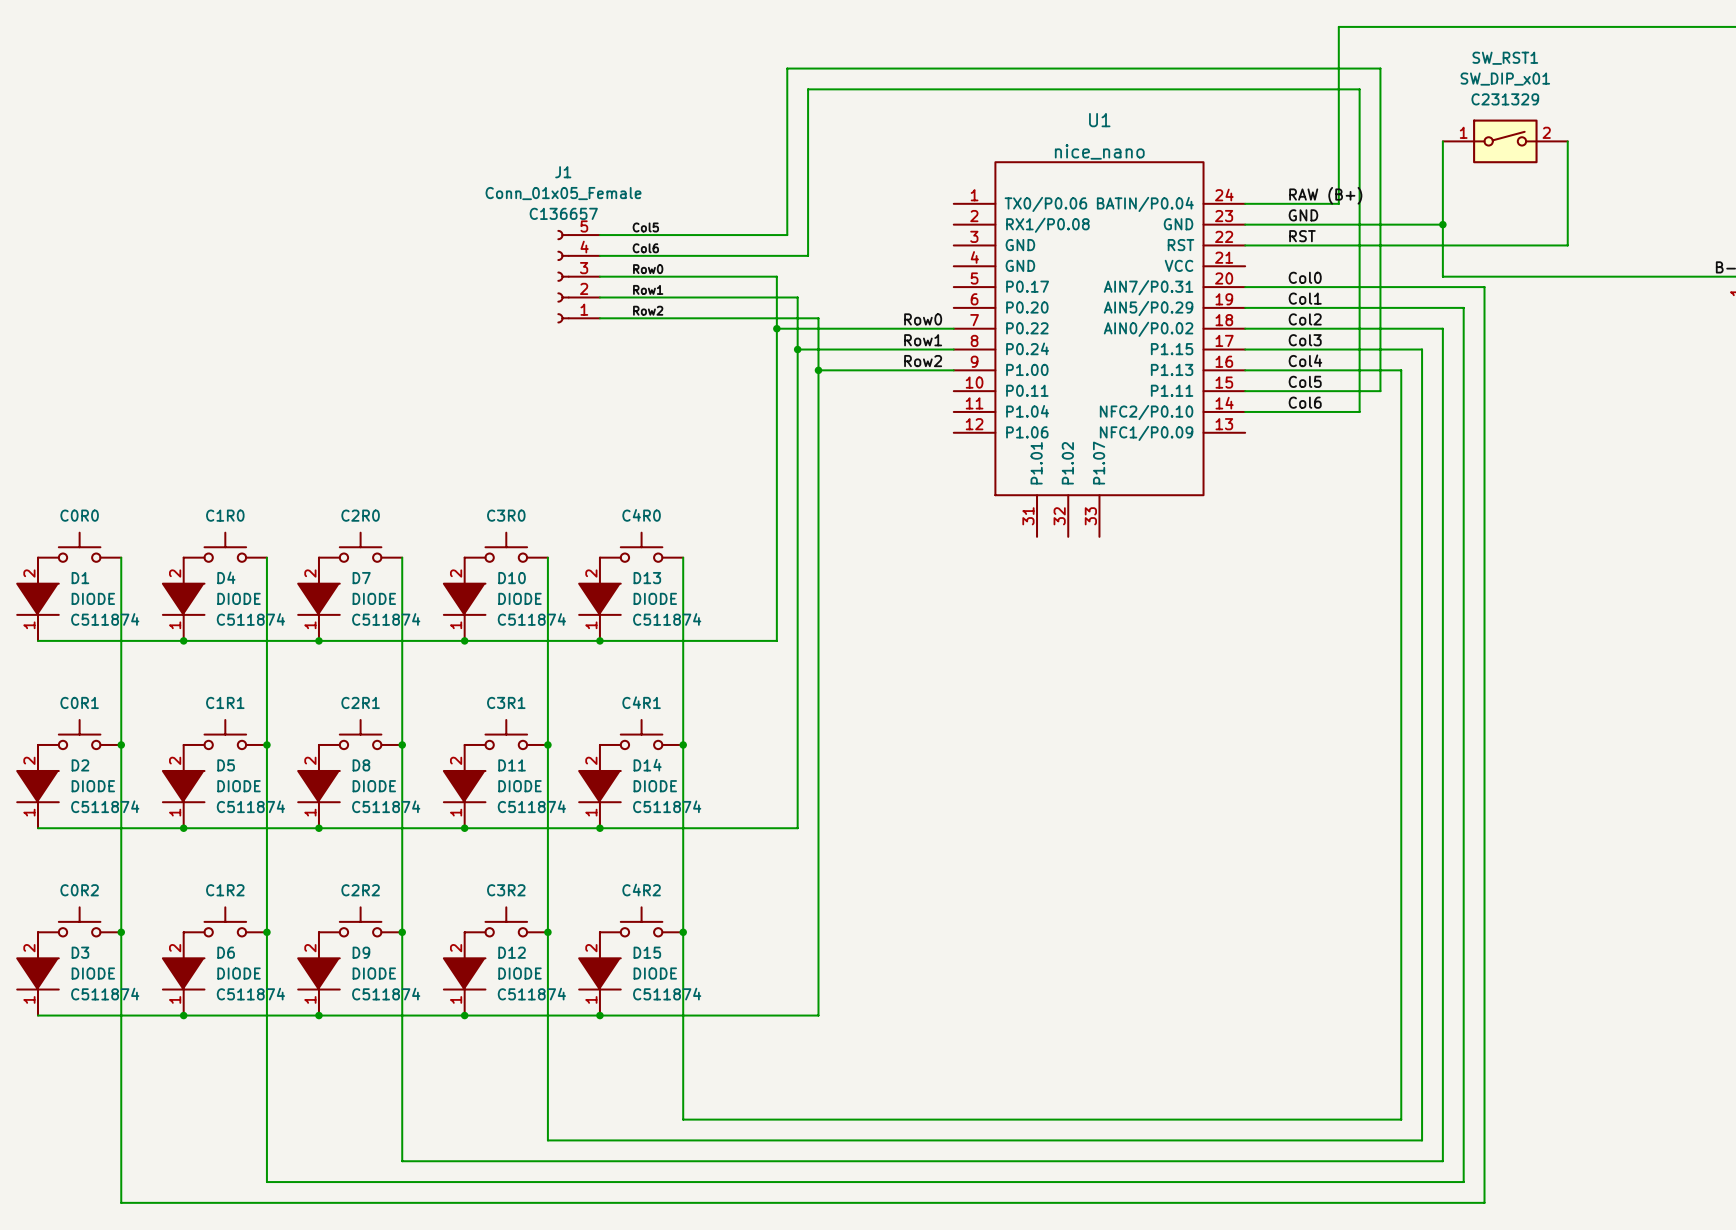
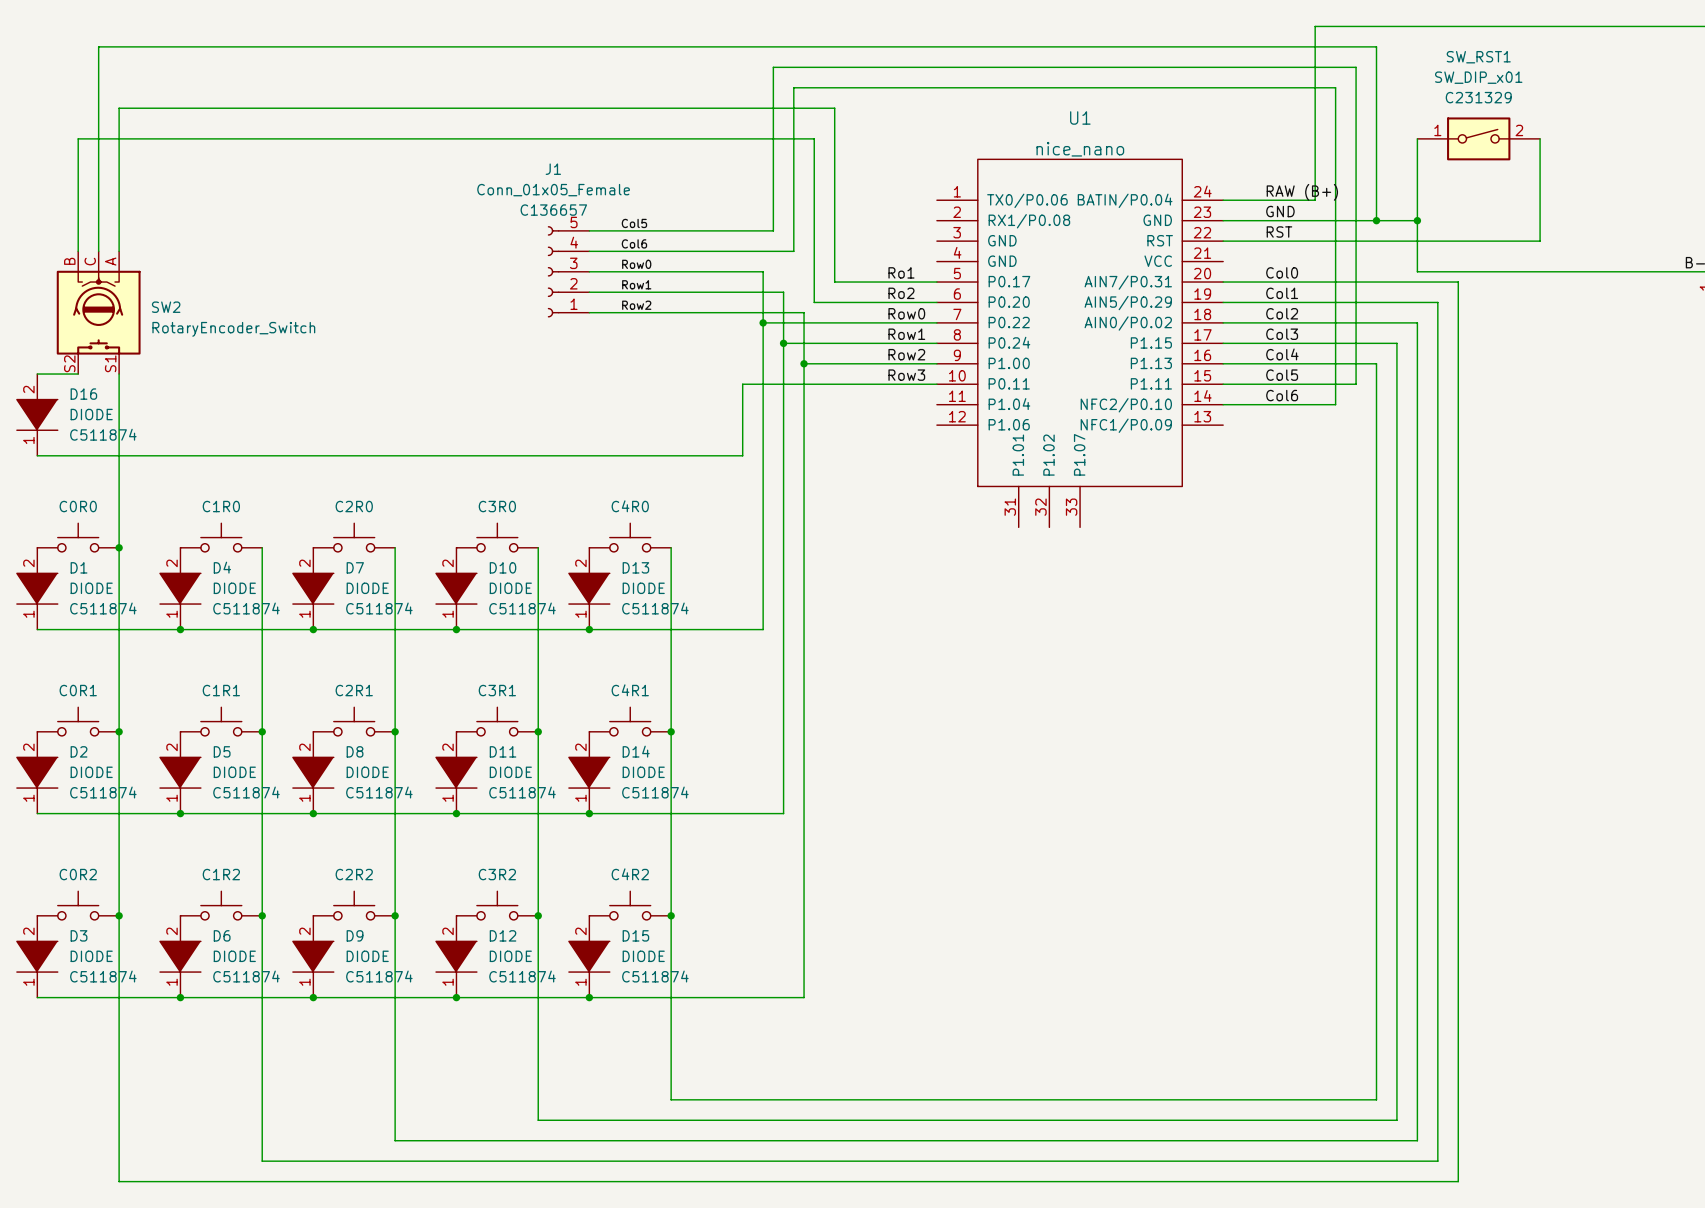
wire: none -> (1376, 220) (1376, 46) (98, 46) (98, 251)
junction: none -> (1376, 220)
wire: none -> (78, 251) (78, 138) (814, 138) (814, 302) (936, 302)
wire: none -> (119, 251) (119, 108) (834, 108) (834, 282) (936, 282)
label: none -> Ro1 (901, 272)
label: none -> Ro2 (901, 293)
SW2: none -> RotaryEncoder_Switch (98, 312)
wire: none -> (37, 374) (78, 374)
wire: none -> (119, 374) (119, 547)
label: none -> Row3 (906, 375)
wire: none -> (936, 384) (742, 384) (742, 455) (37, 455)
D16: none -> DIODE (37, 414)
junction: none -> (119, 547)

